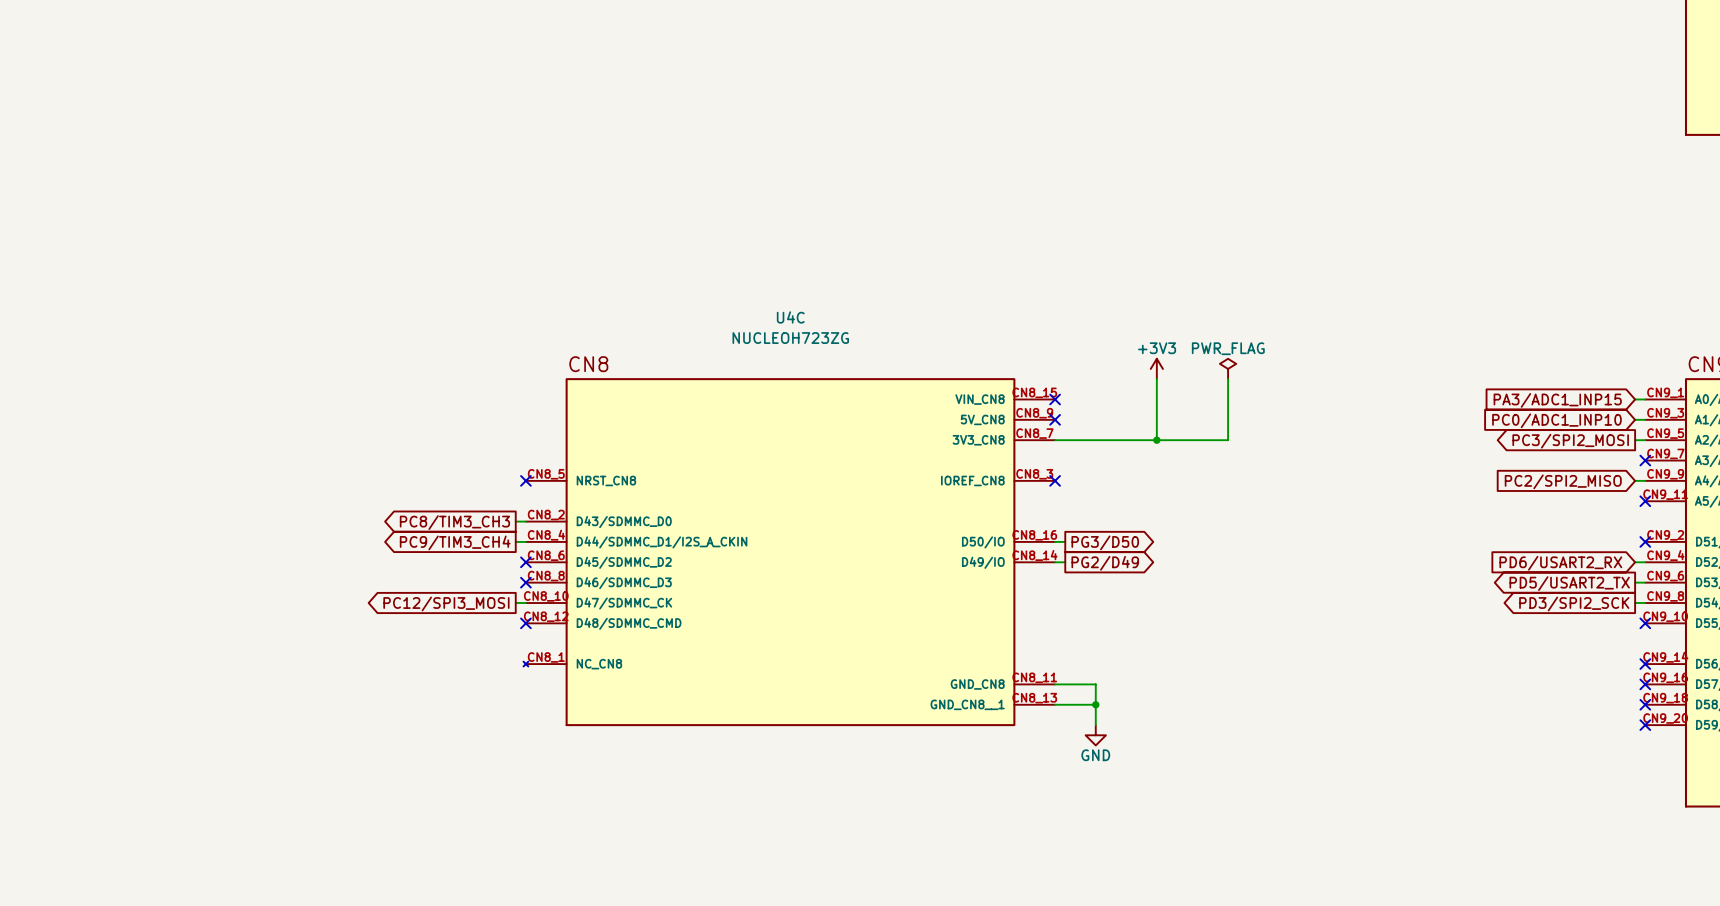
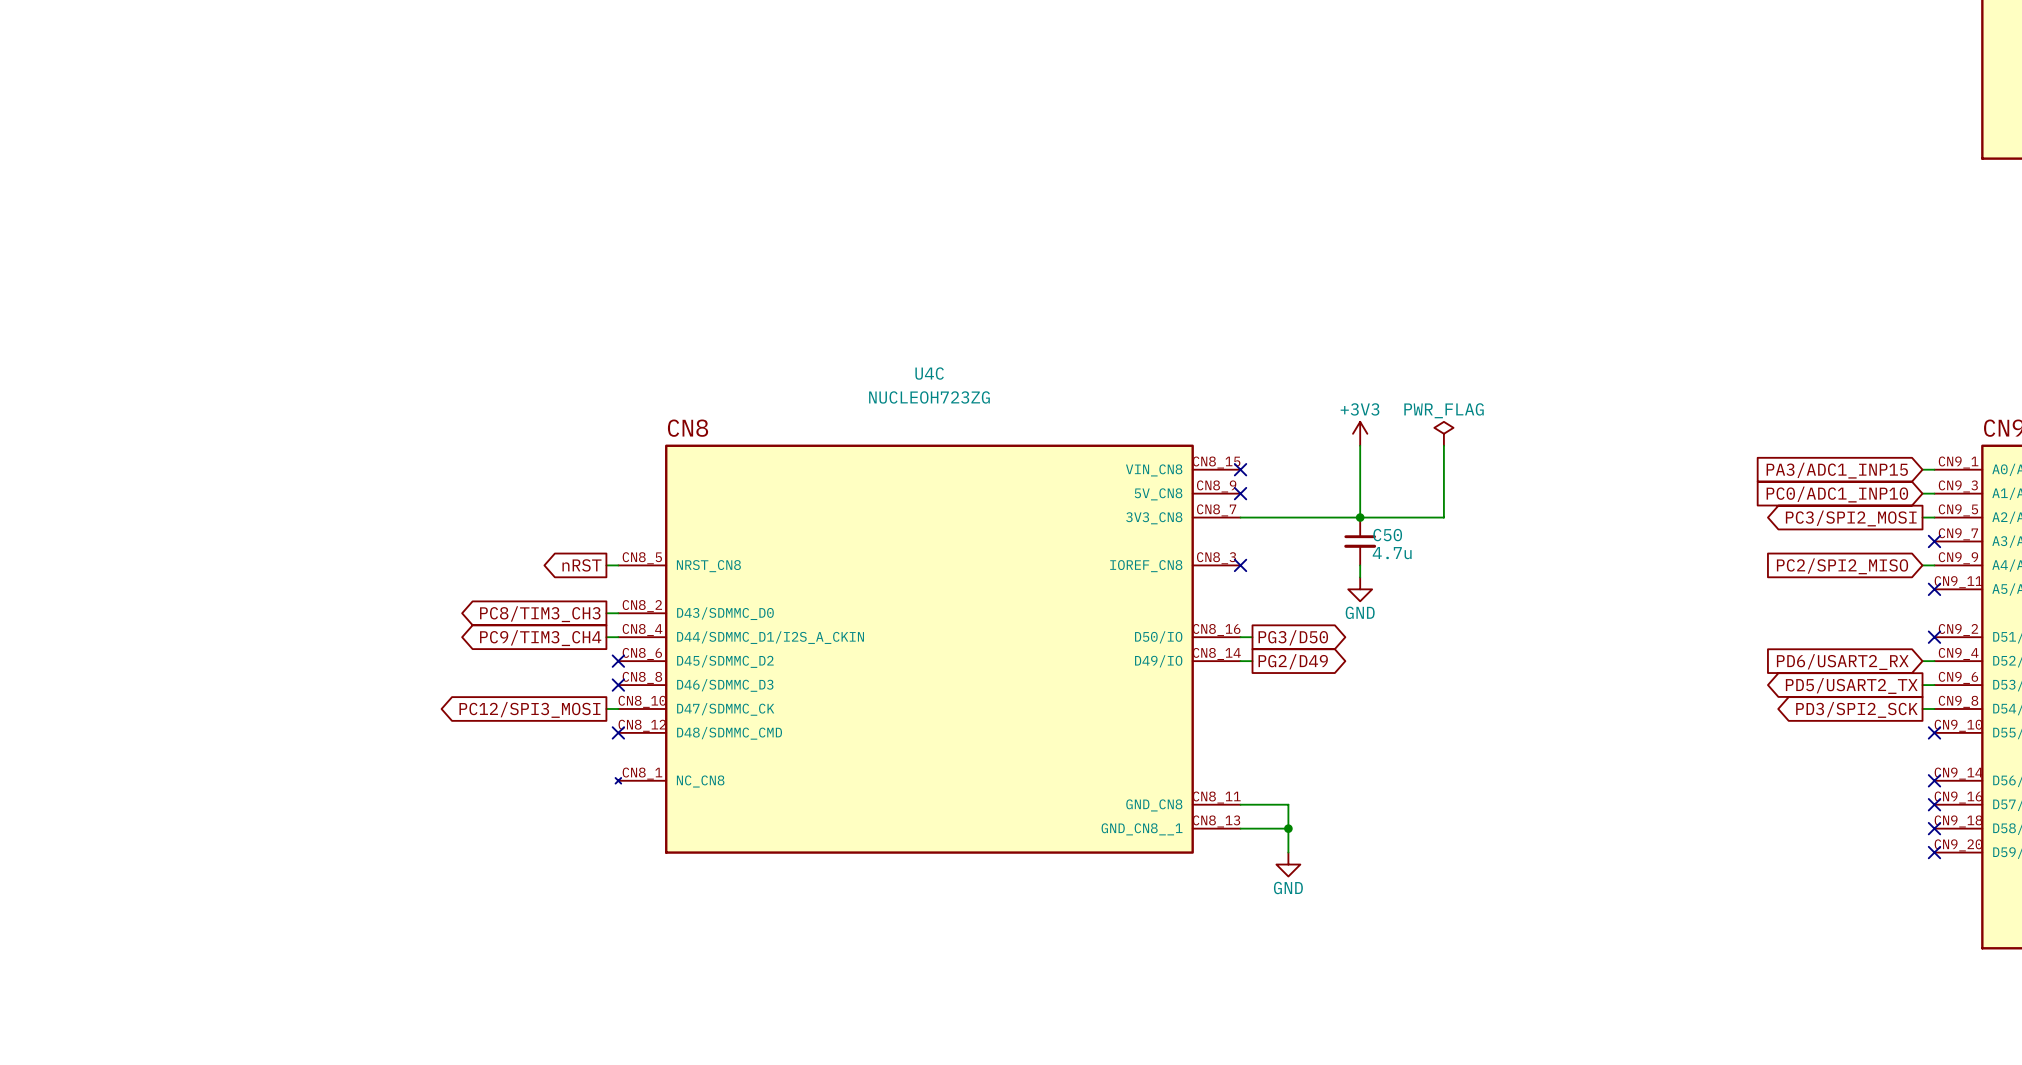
C50: none -> 4.7u (1360, 541)
global label: none -> nRST (581, 565)
wire: none -> (606, 565) (618, 565)
no-connect mark: (525, 480) -> none
wire: none -> (1360, 565) (1360, 577)
power symbol: none -> GND (1360, 589)

